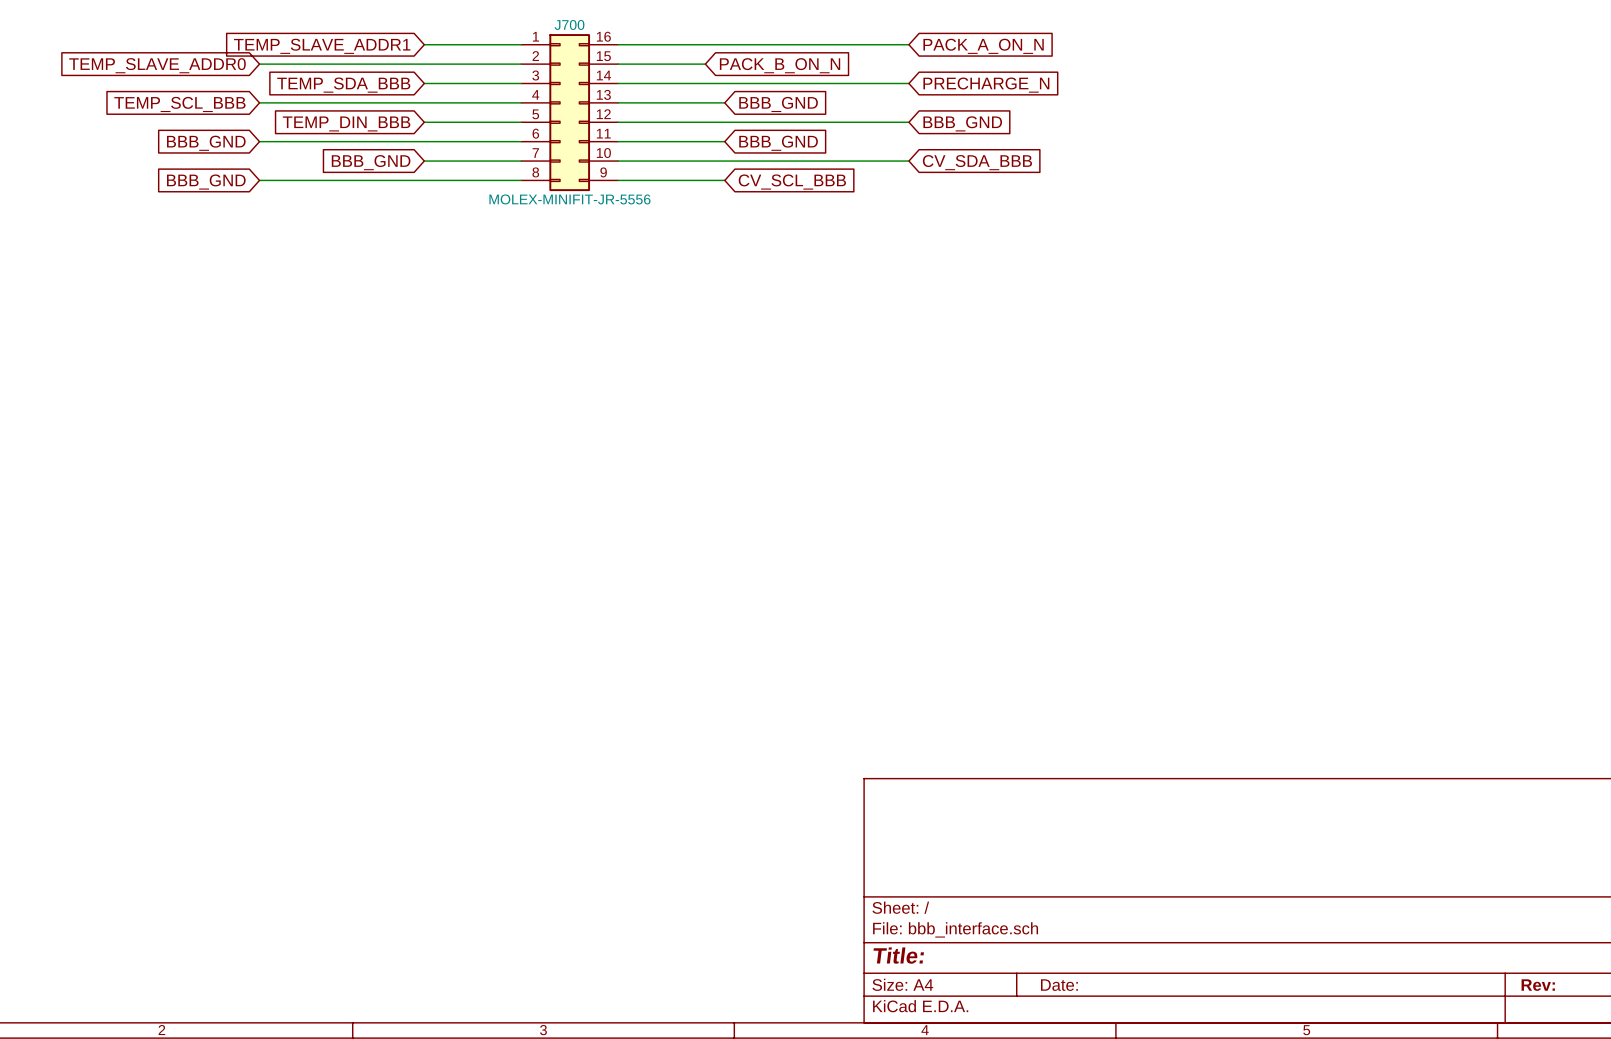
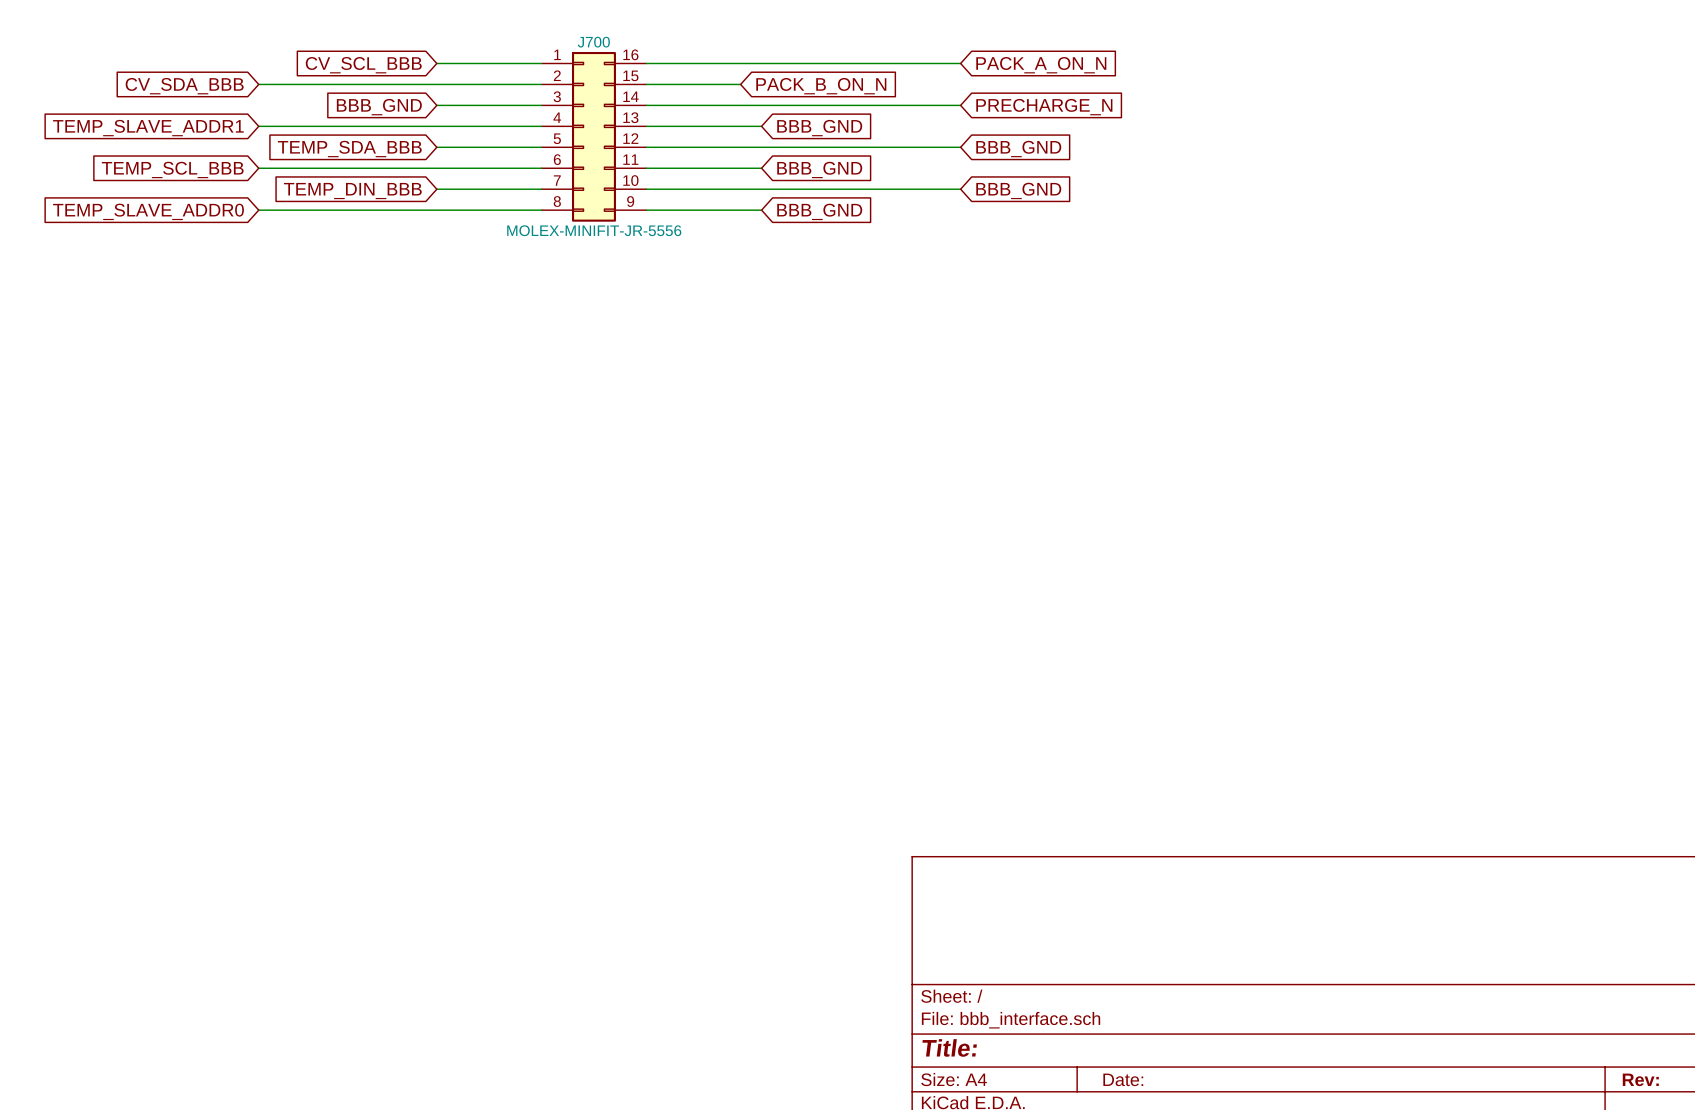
global label: TEMP_SLAVE_ADDR1 (322, 46) -> CV_SCL_BBB (363, 65)
global label: TEMP_SLAVE_ADDR0 (157, 65) -> CV_SDA_BBB (184, 86)
global label: TEMP_SDA_BBB (343, 85) -> BBB_GND (379, 107)
global label: TEMP_SCL_BBB (179, 104) -> TEMP_SLAVE_ADDR1 (148, 128)
global label: TEMP_DIN_BBB (346, 123) -> TEMP_SDA_BBB (349, 149)
global label: BBB_GND (206, 143) -> TEMP_SCL_BBB (172, 169)
global label: BBB_GND (371, 162) -> TEMP_DIN_BBB (352, 191)
global label: CV_SDA_BBB (977, 162) -> BBB_GND (1018, 190)
global label: BBB_GND (206, 182) -> TEMP_SLAVE_ADDR0 (148, 211)
global label: CV_SCL_BBB (792, 182) -> BBB_GND (819, 211)

